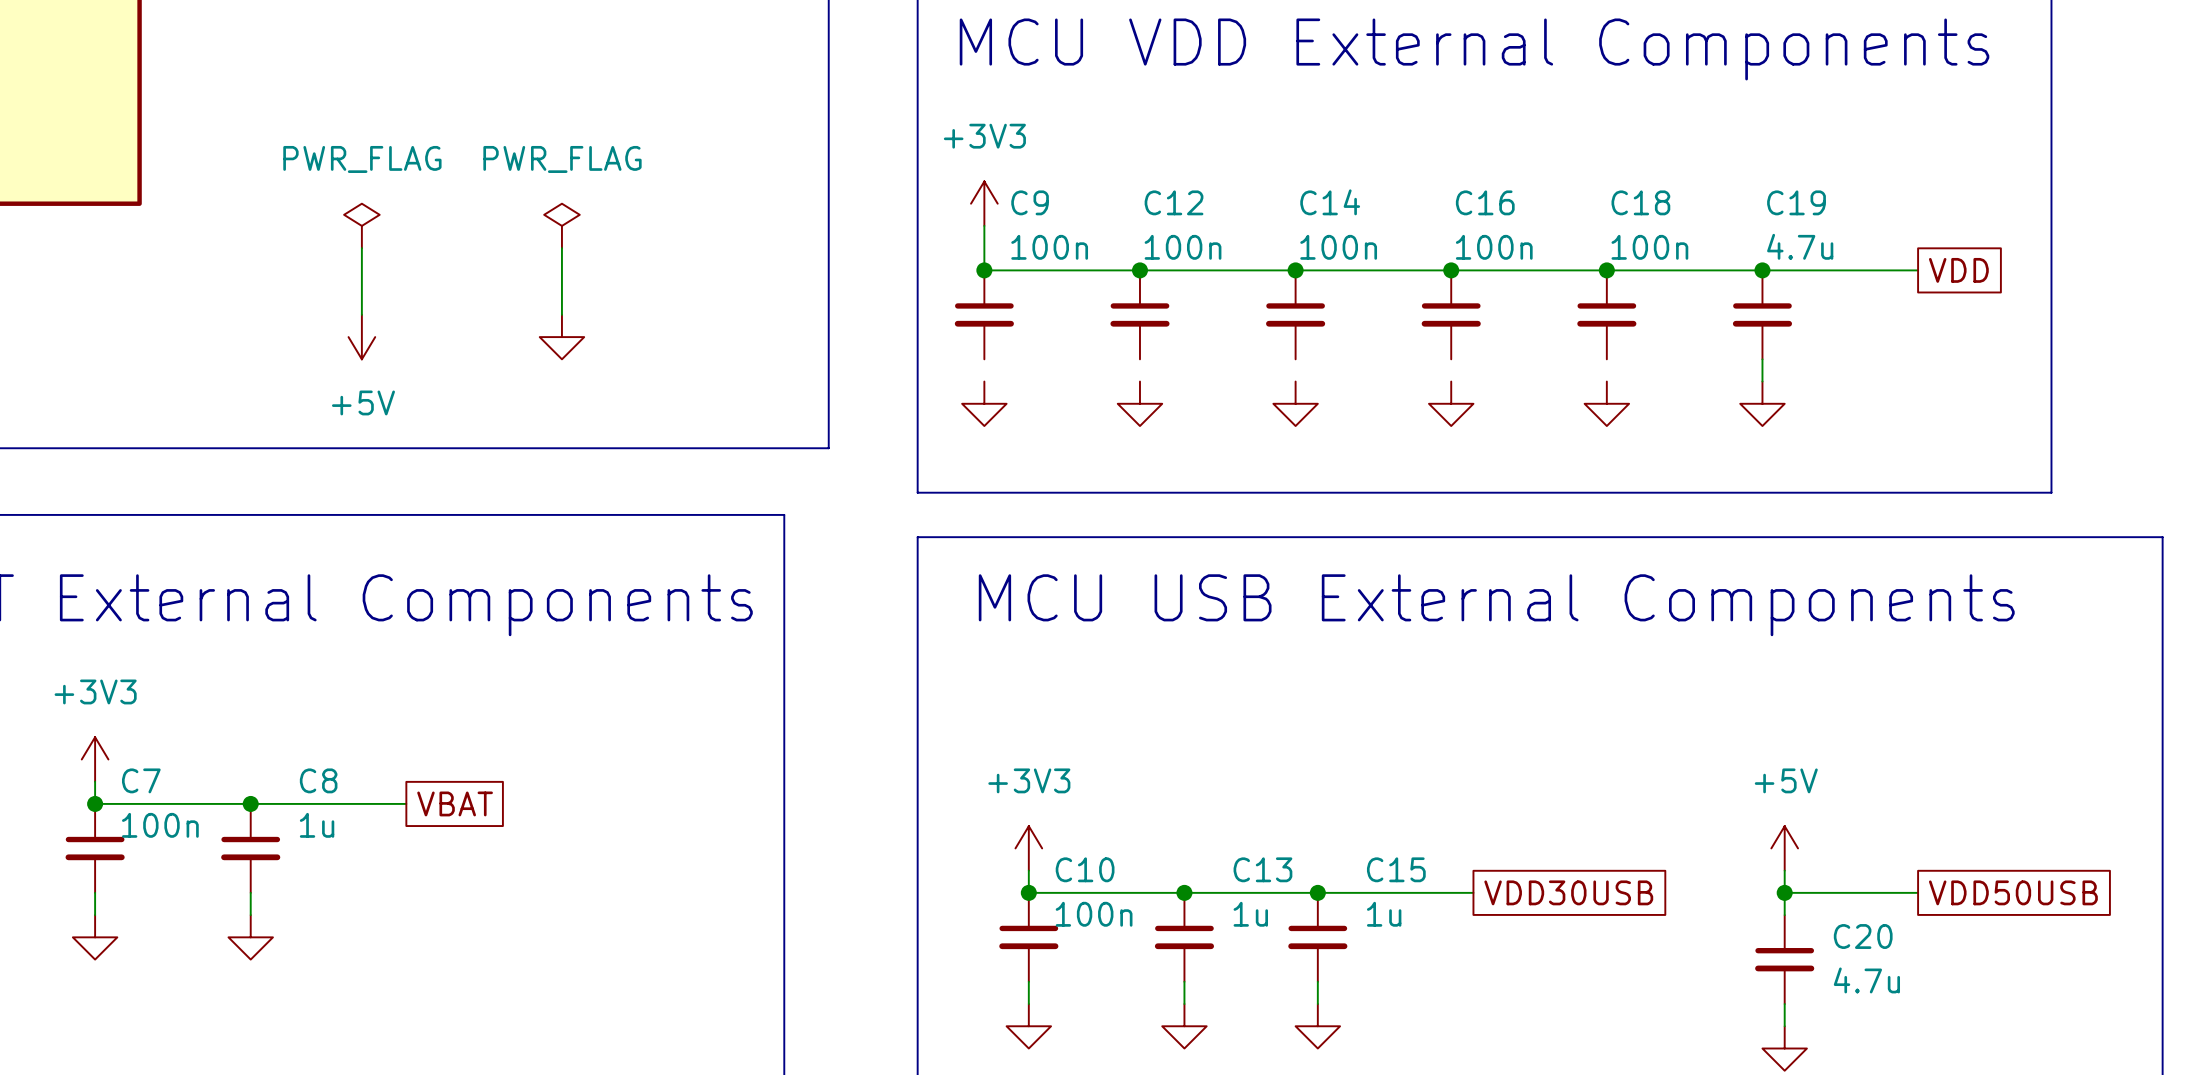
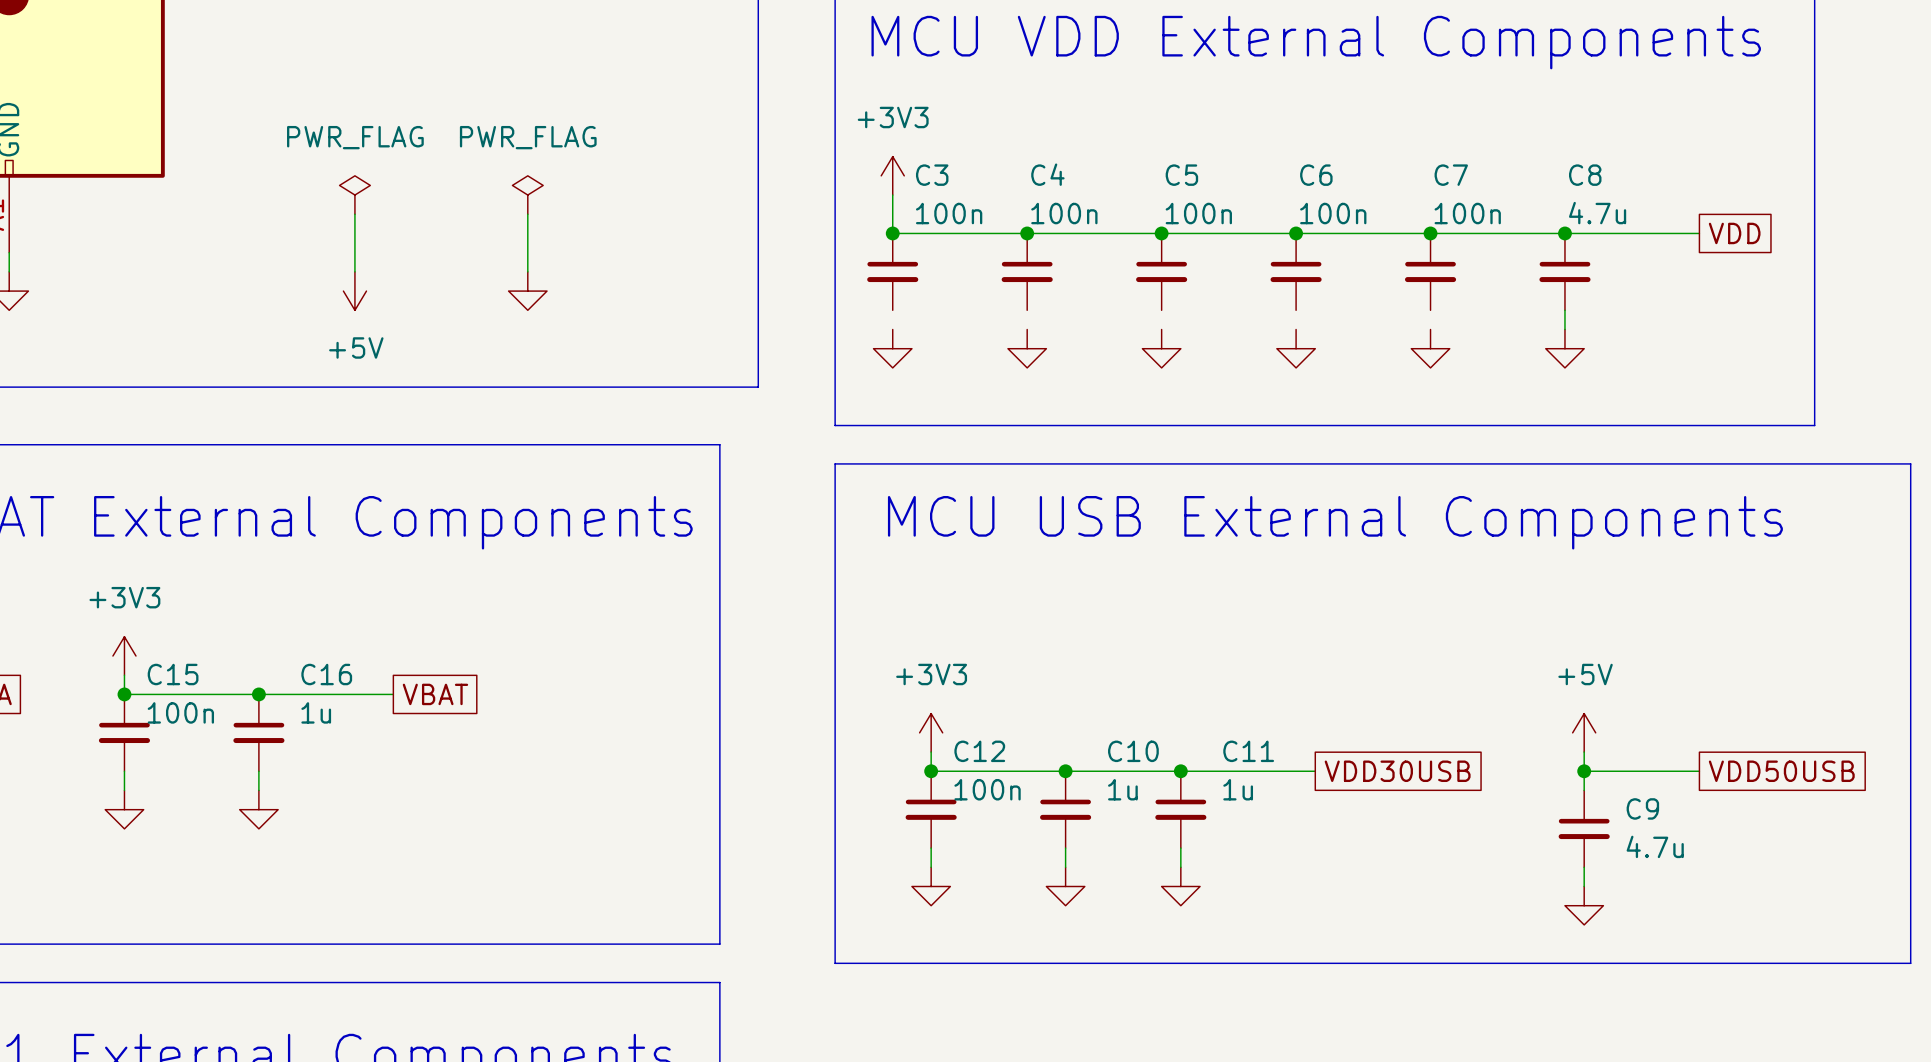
C9 name: C9 (1030, 202) -> C3 (932, 175)
C12 name: C12 (1174, 202) -> C4 (1047, 174)
C14 name: C14 (1330, 202) -> C5 (1181, 175)
C16 name: C16 (1485, 202) -> C6 (1316, 175)
C18 name: C18 (1640, 202) -> C7 (1451, 175)
C19 name: C19 (1796, 202) -> C8 (1585, 175)
C7 name: C7 (141, 780) -> C15 (173, 674)
C8 name: C8 (318, 780) -> C16 (326, 674)
C10 name: C10 (1085, 869) -> C12 (979, 751)
C13 name: C13 (1262, 869) -> C10 (1133, 751)
C15 name: C15 (1396, 869) -> C11 (1248, 751)
C20 name: C20 (1863, 936) -> C9 (1642, 808)

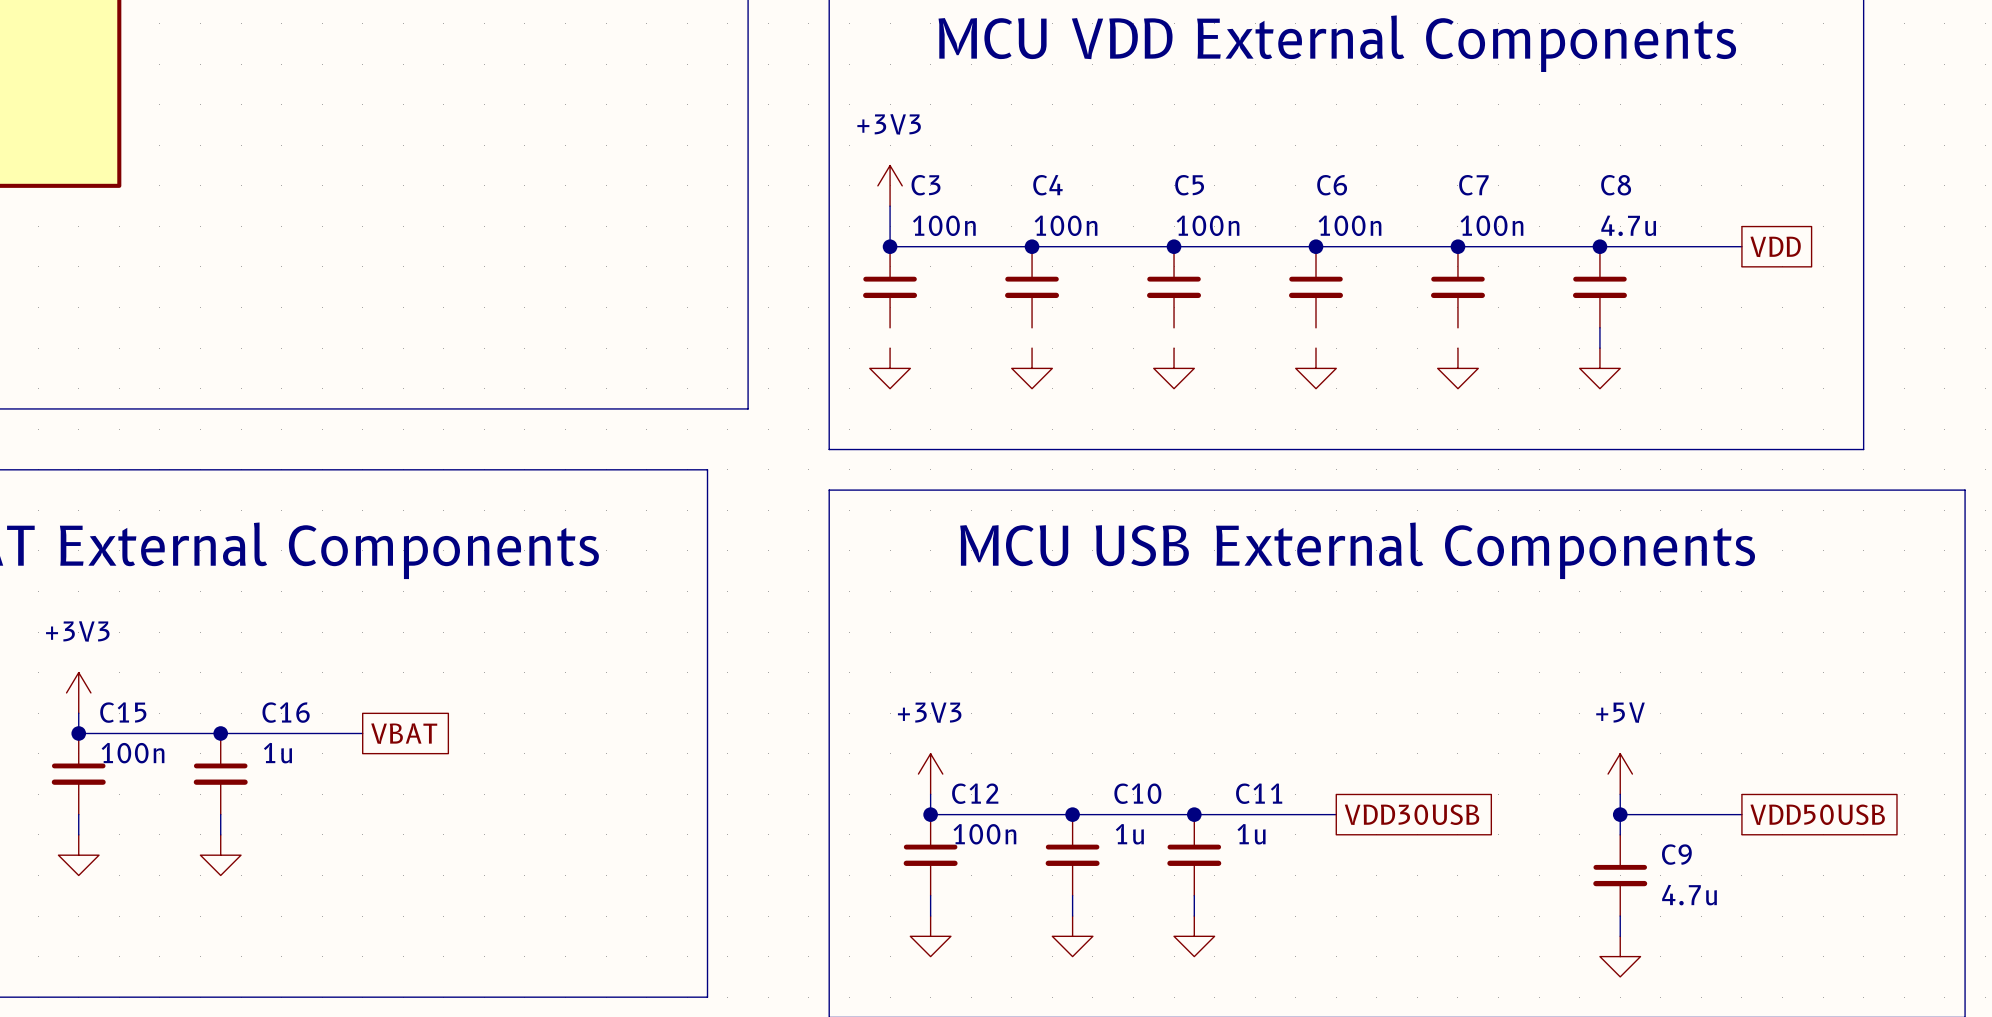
power symbol: PWR_FLAG (354, 195) -> none
power symbol: PWR_FLAG (527, 195) -> none
wire: (354, 214) (354, 271) -> none
wire: (527, 214) (527, 271) -> none
power symbol: +5V (354, 291) -> none
power symbol: (527, 291) -> none

